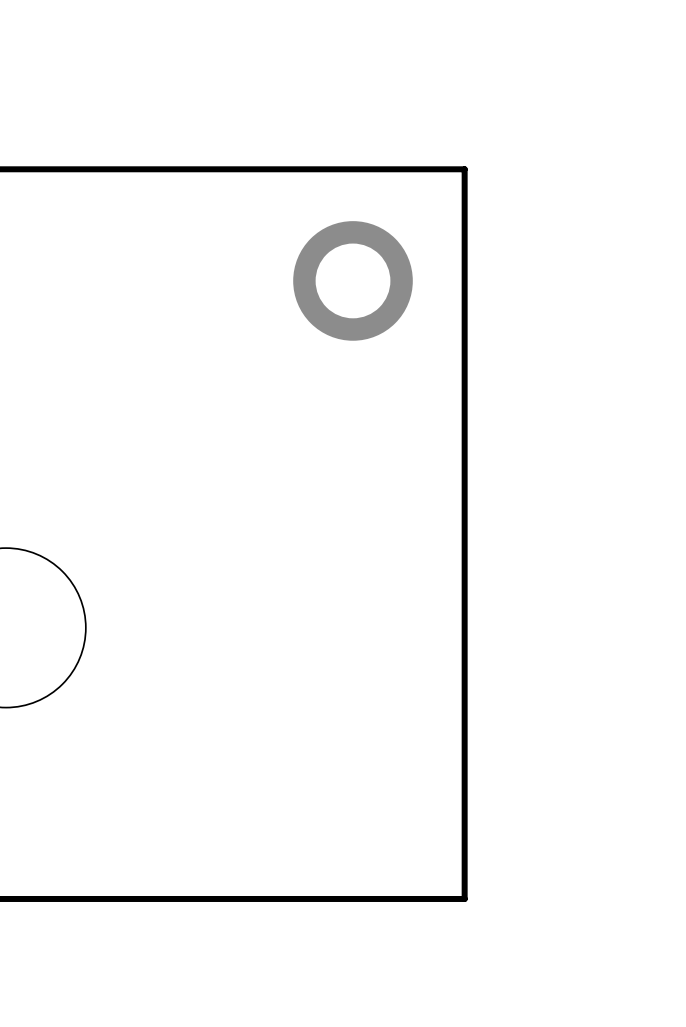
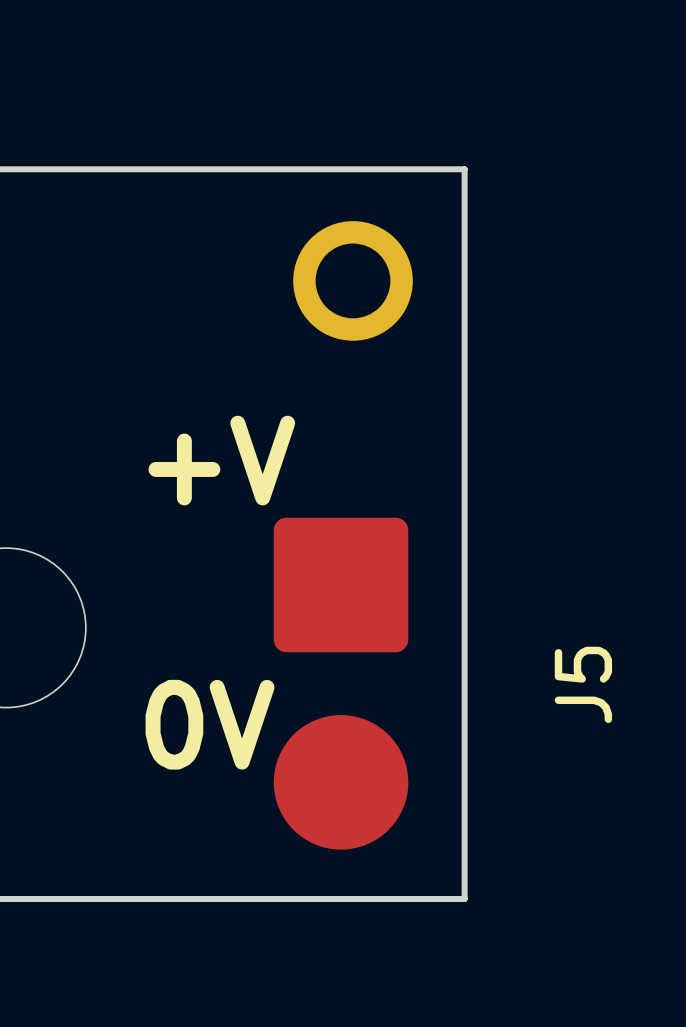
text: none -> +V (221, 460)
J5: none -> (341, 683)
text: none -> 0V (210, 724)

